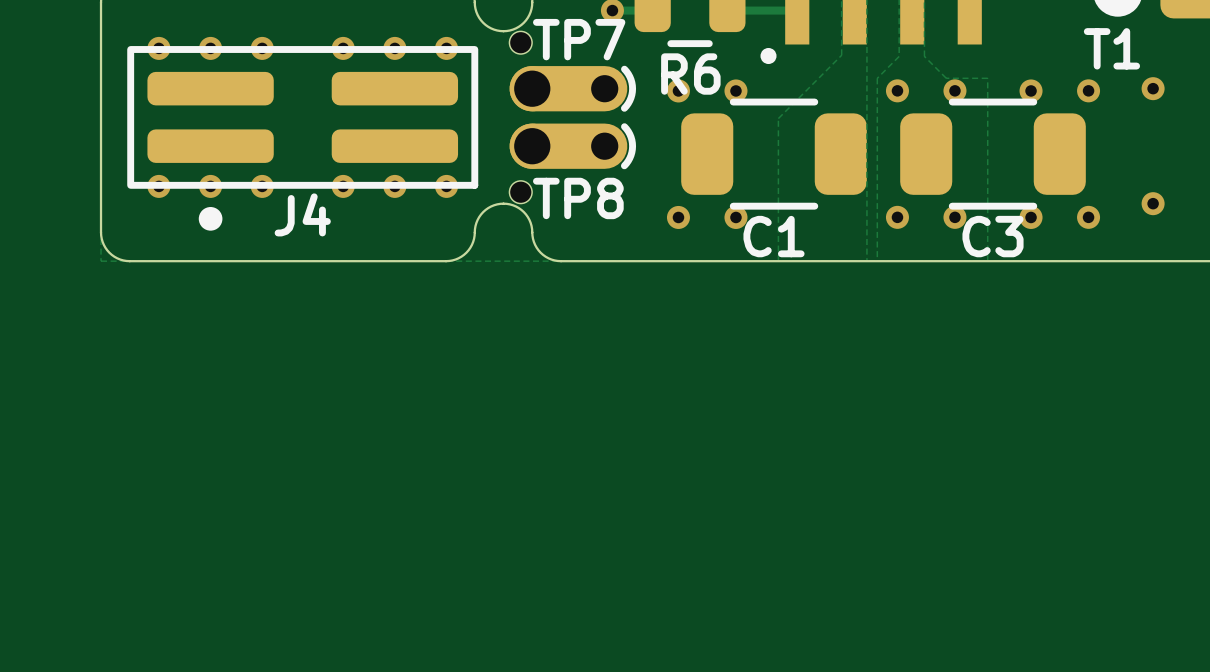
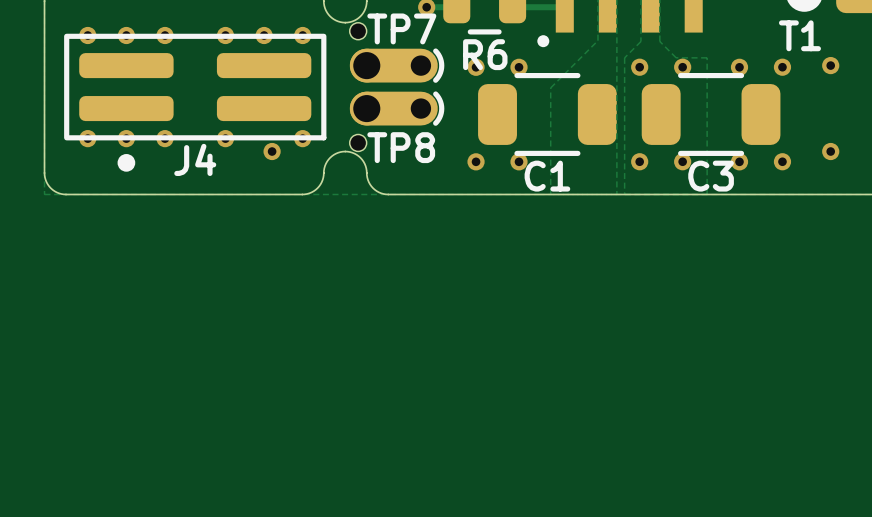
via position: (394, 186) -> (272, 151)

